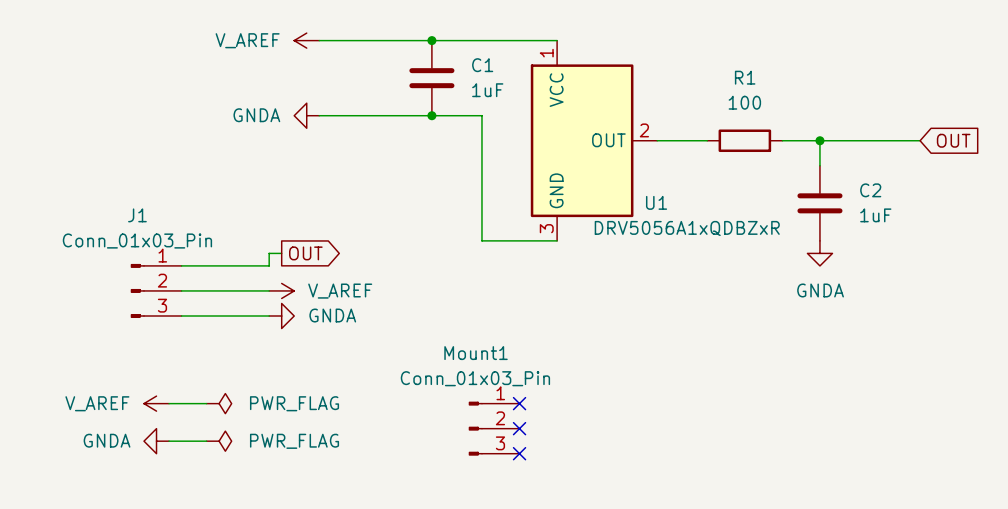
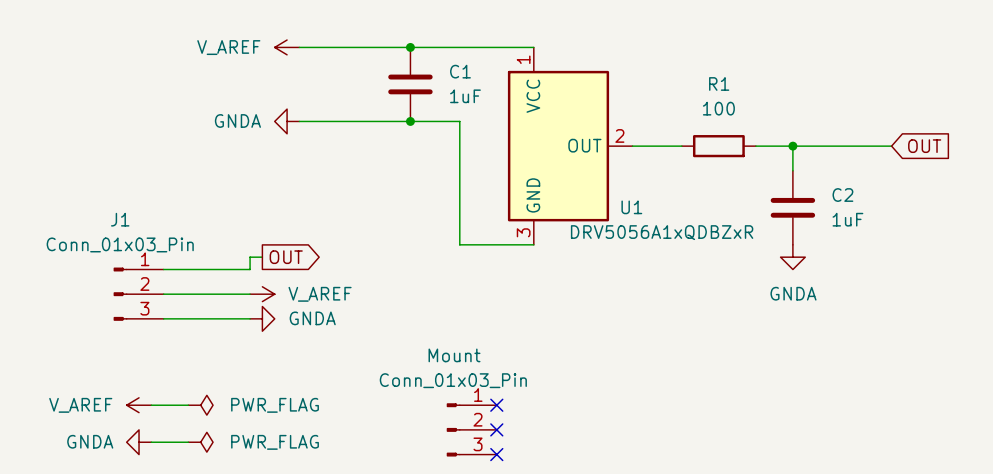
Mount1 name: Mount1 (476, 353) -> Mount (454, 355)

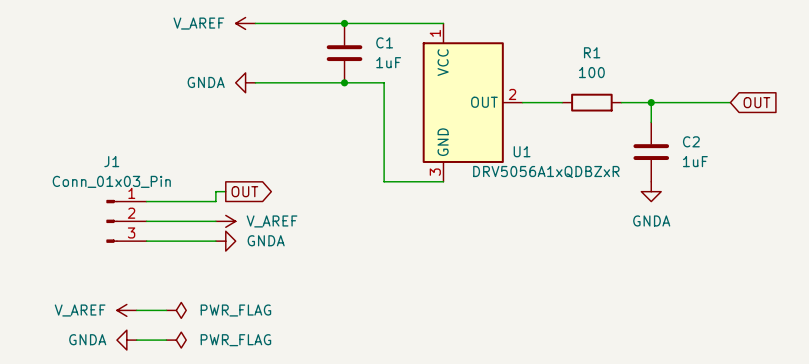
no-connect mark: (496, 405) -> none
Mount: Conn_01x03_Pin (471, 429) -> none
no-connect mark: (496, 429) -> none
no-connect mark: (496, 454) -> none

